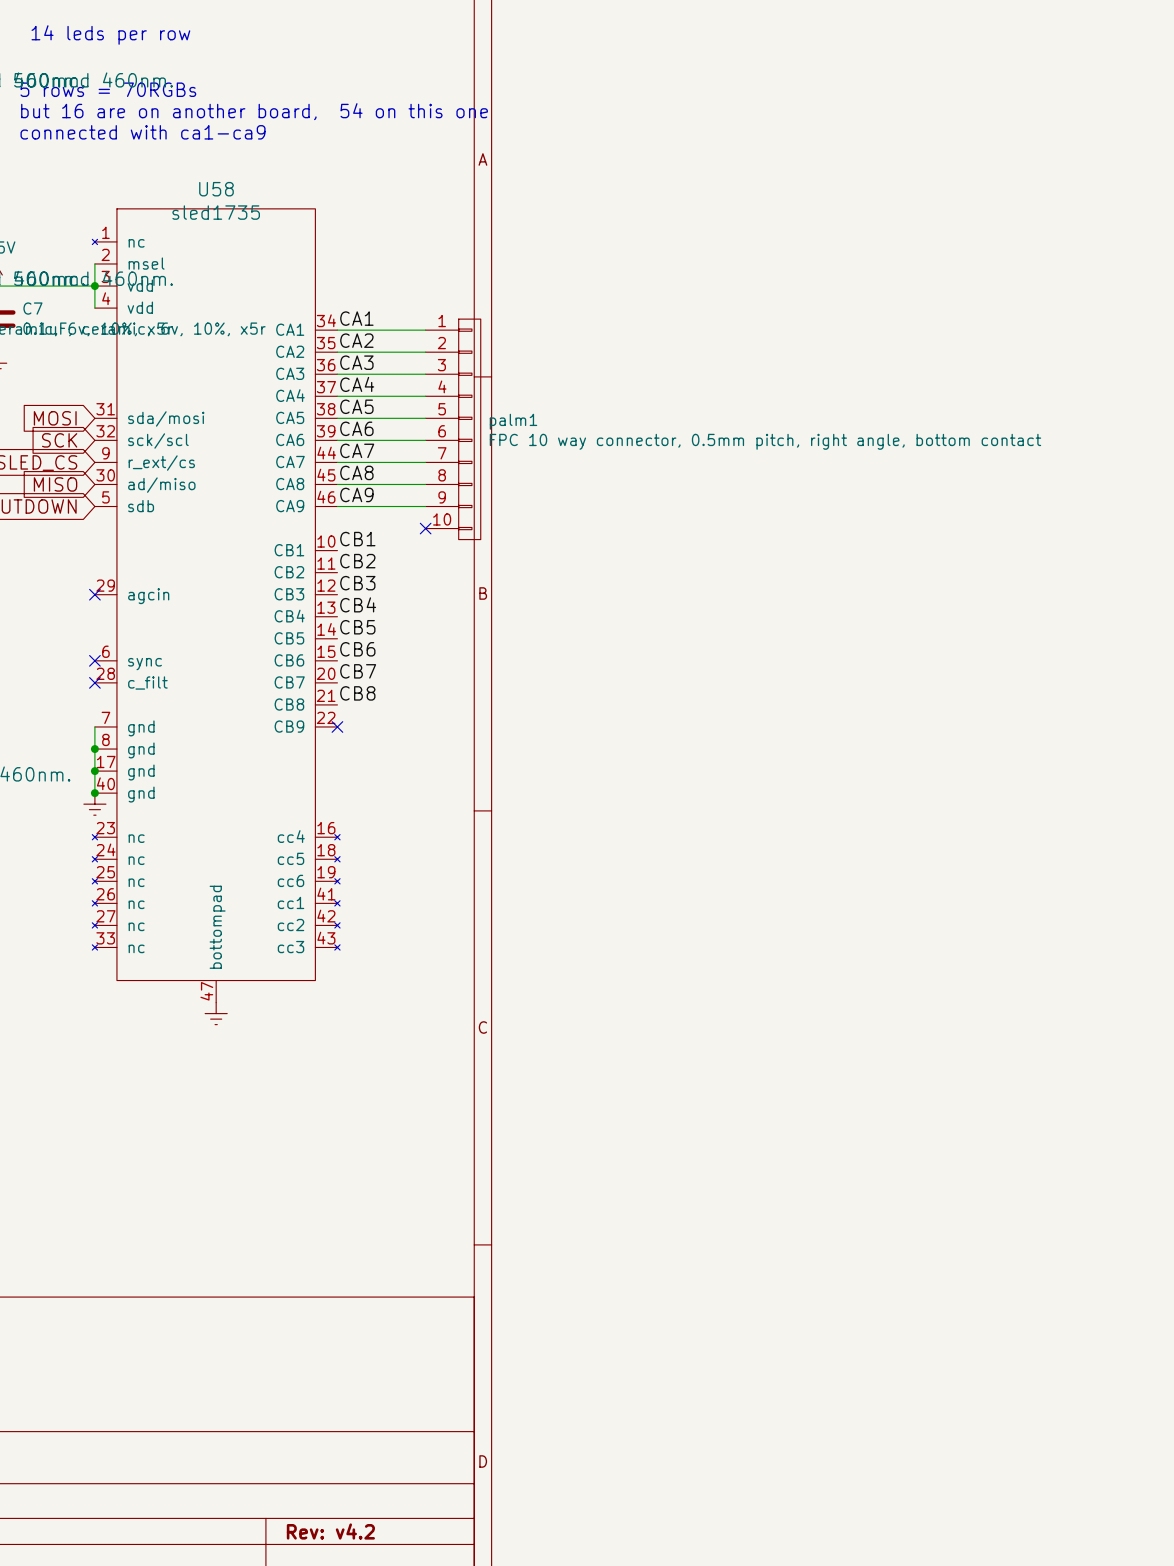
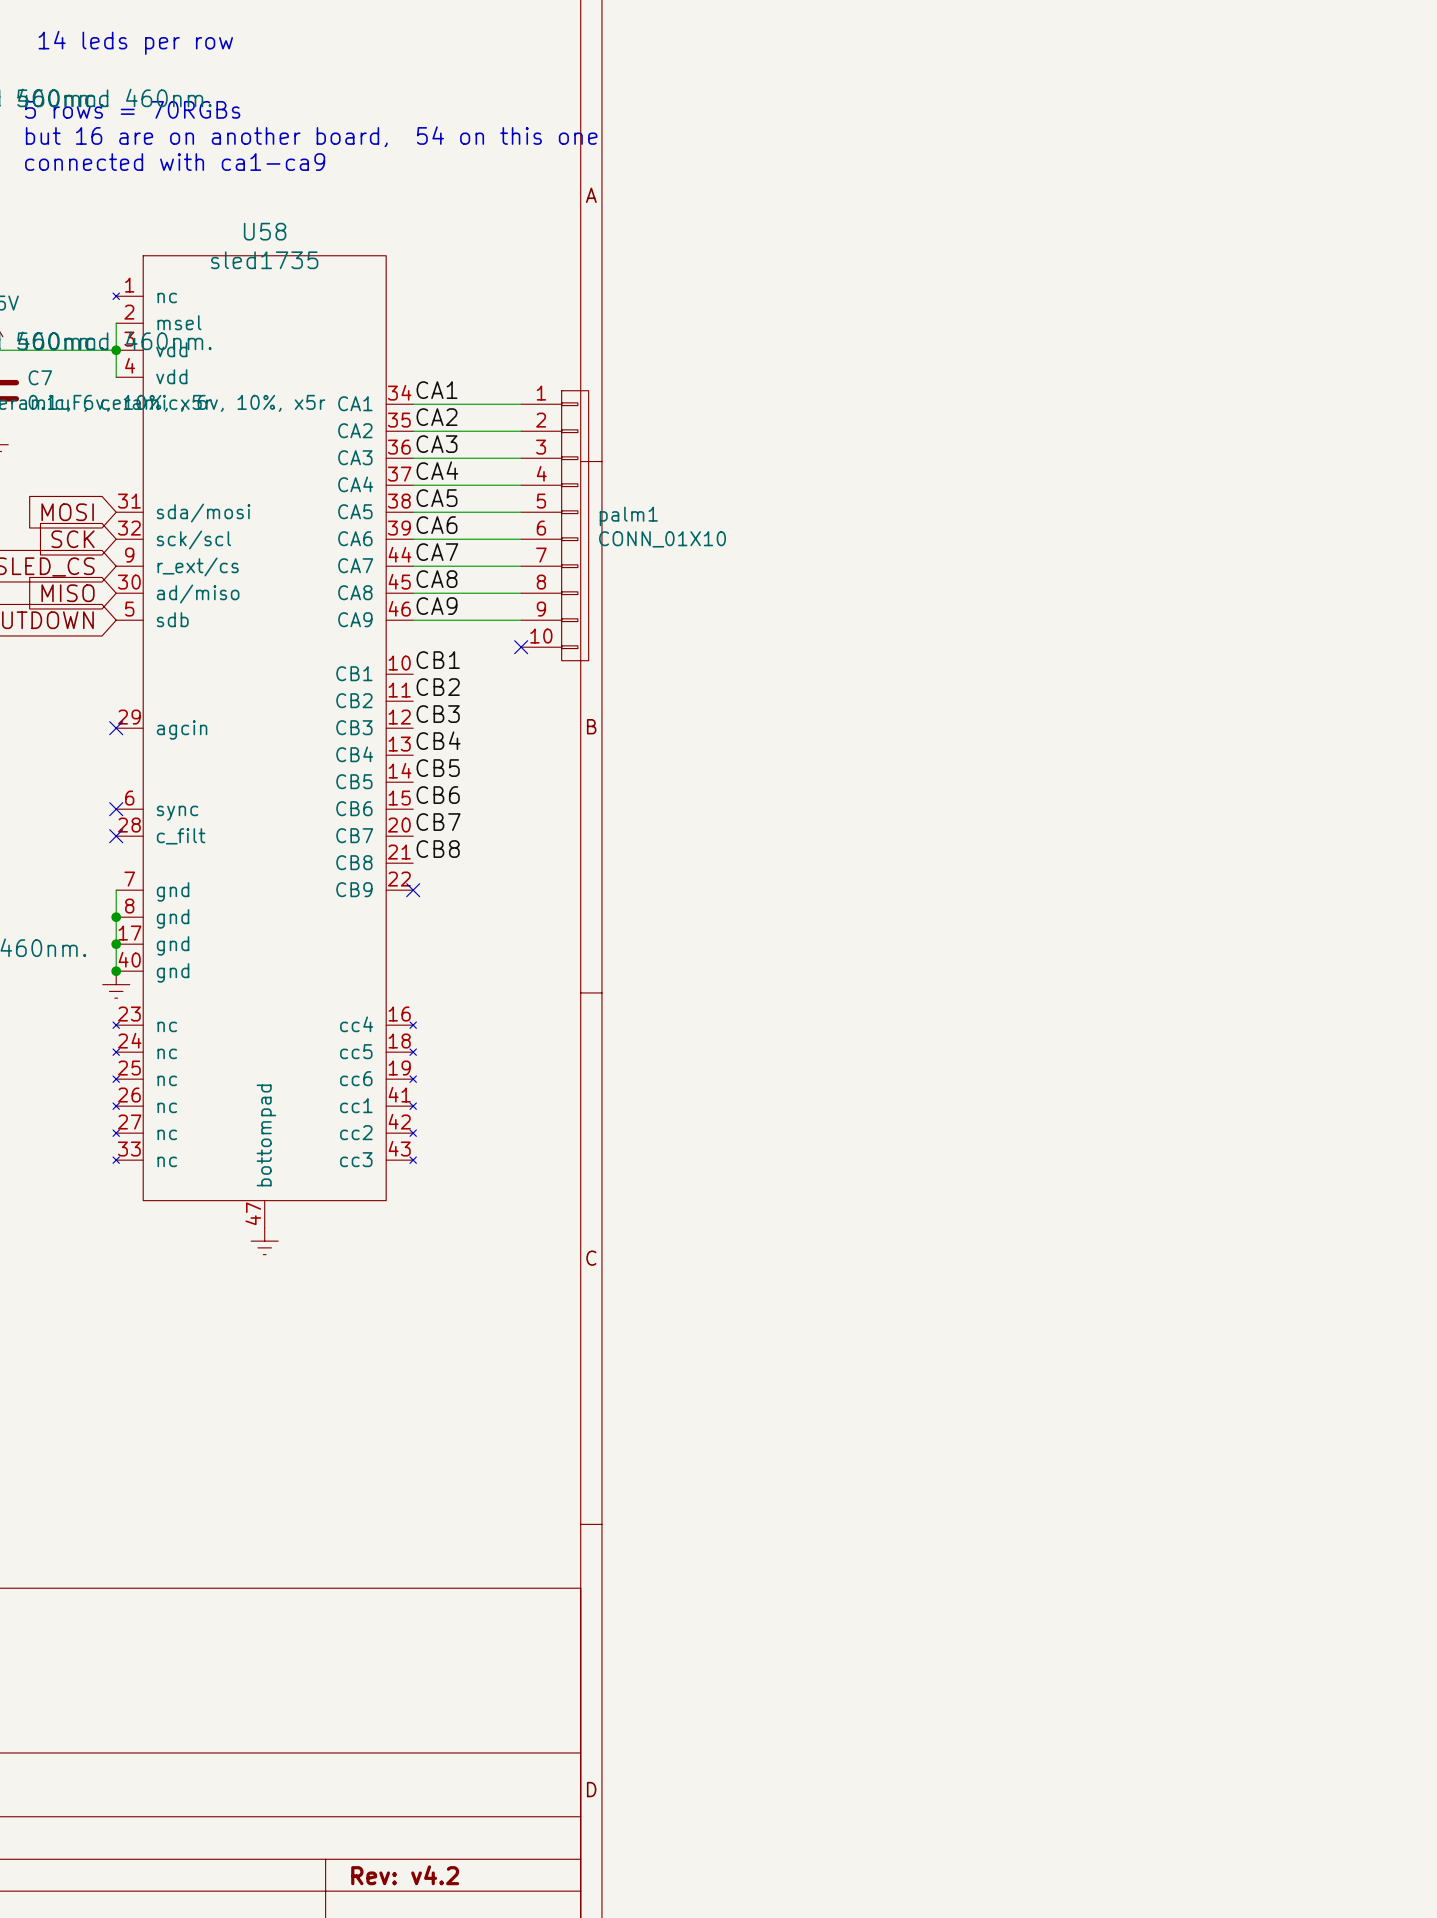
palm1 value: FPC 10 way connector, 0.5mm pitch, right angle, bottom contact (765, 441) -> CONN_01X10 (662, 539)

